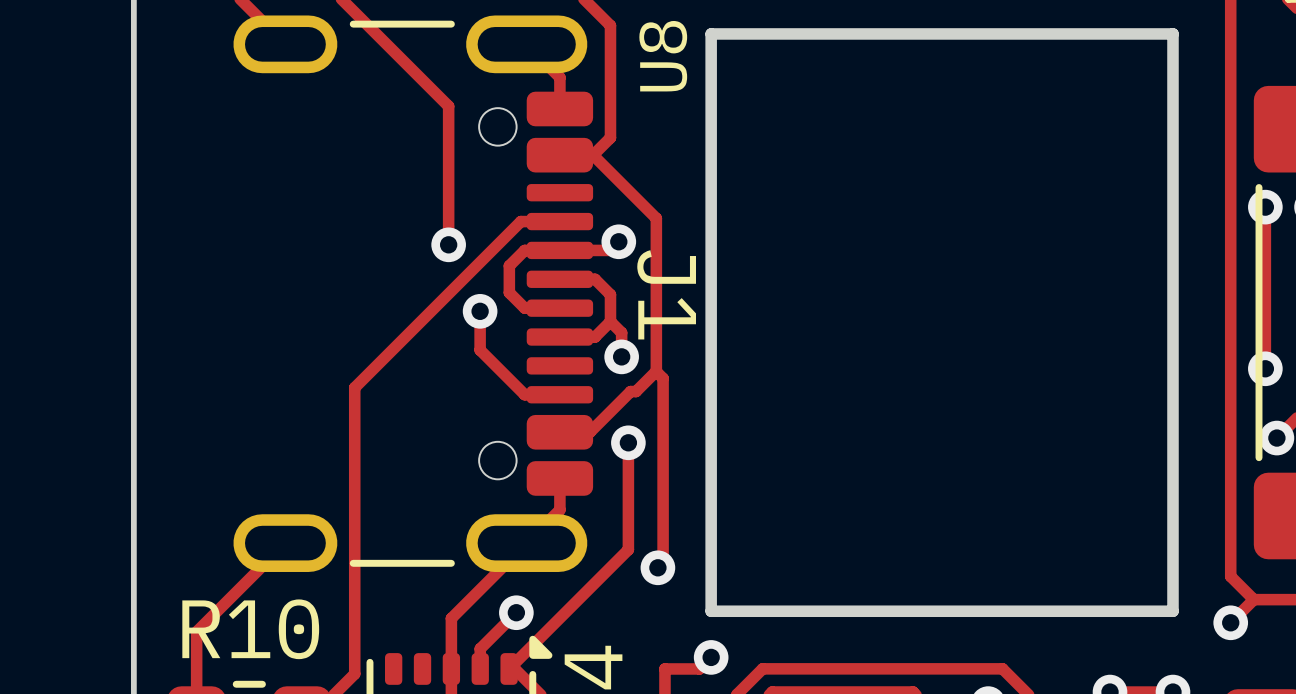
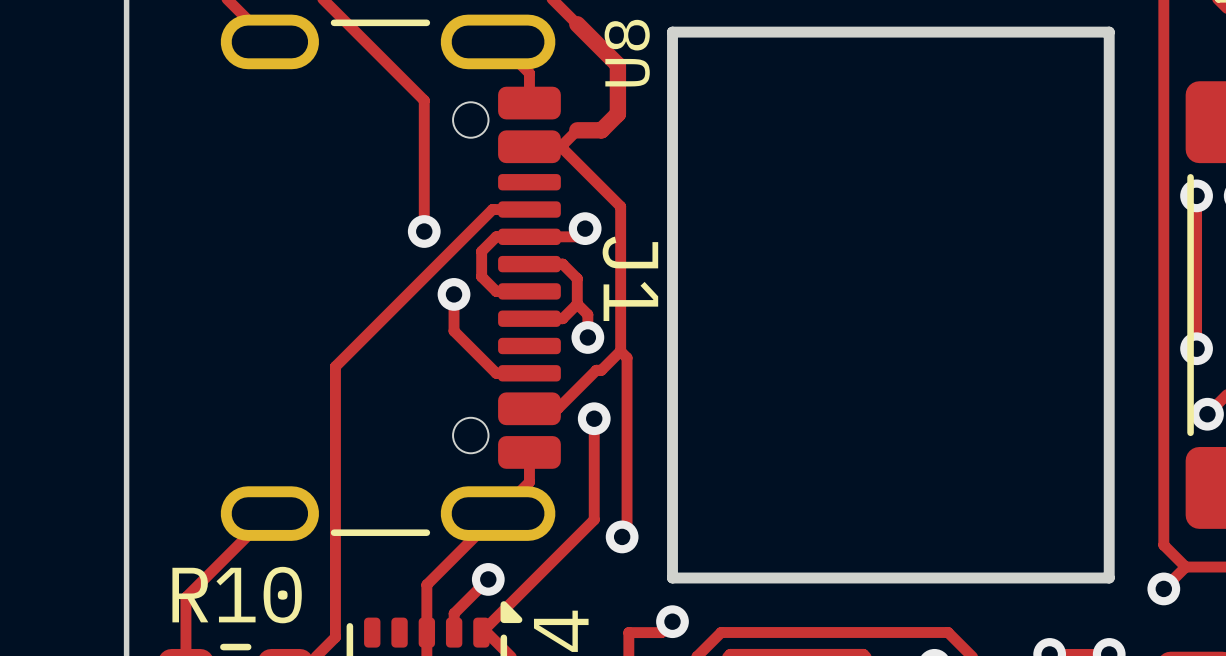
track: (610, 25) (610, 137) -> (577, 24) (617, 64) (617, 113) (601, 130) (577, 130)

